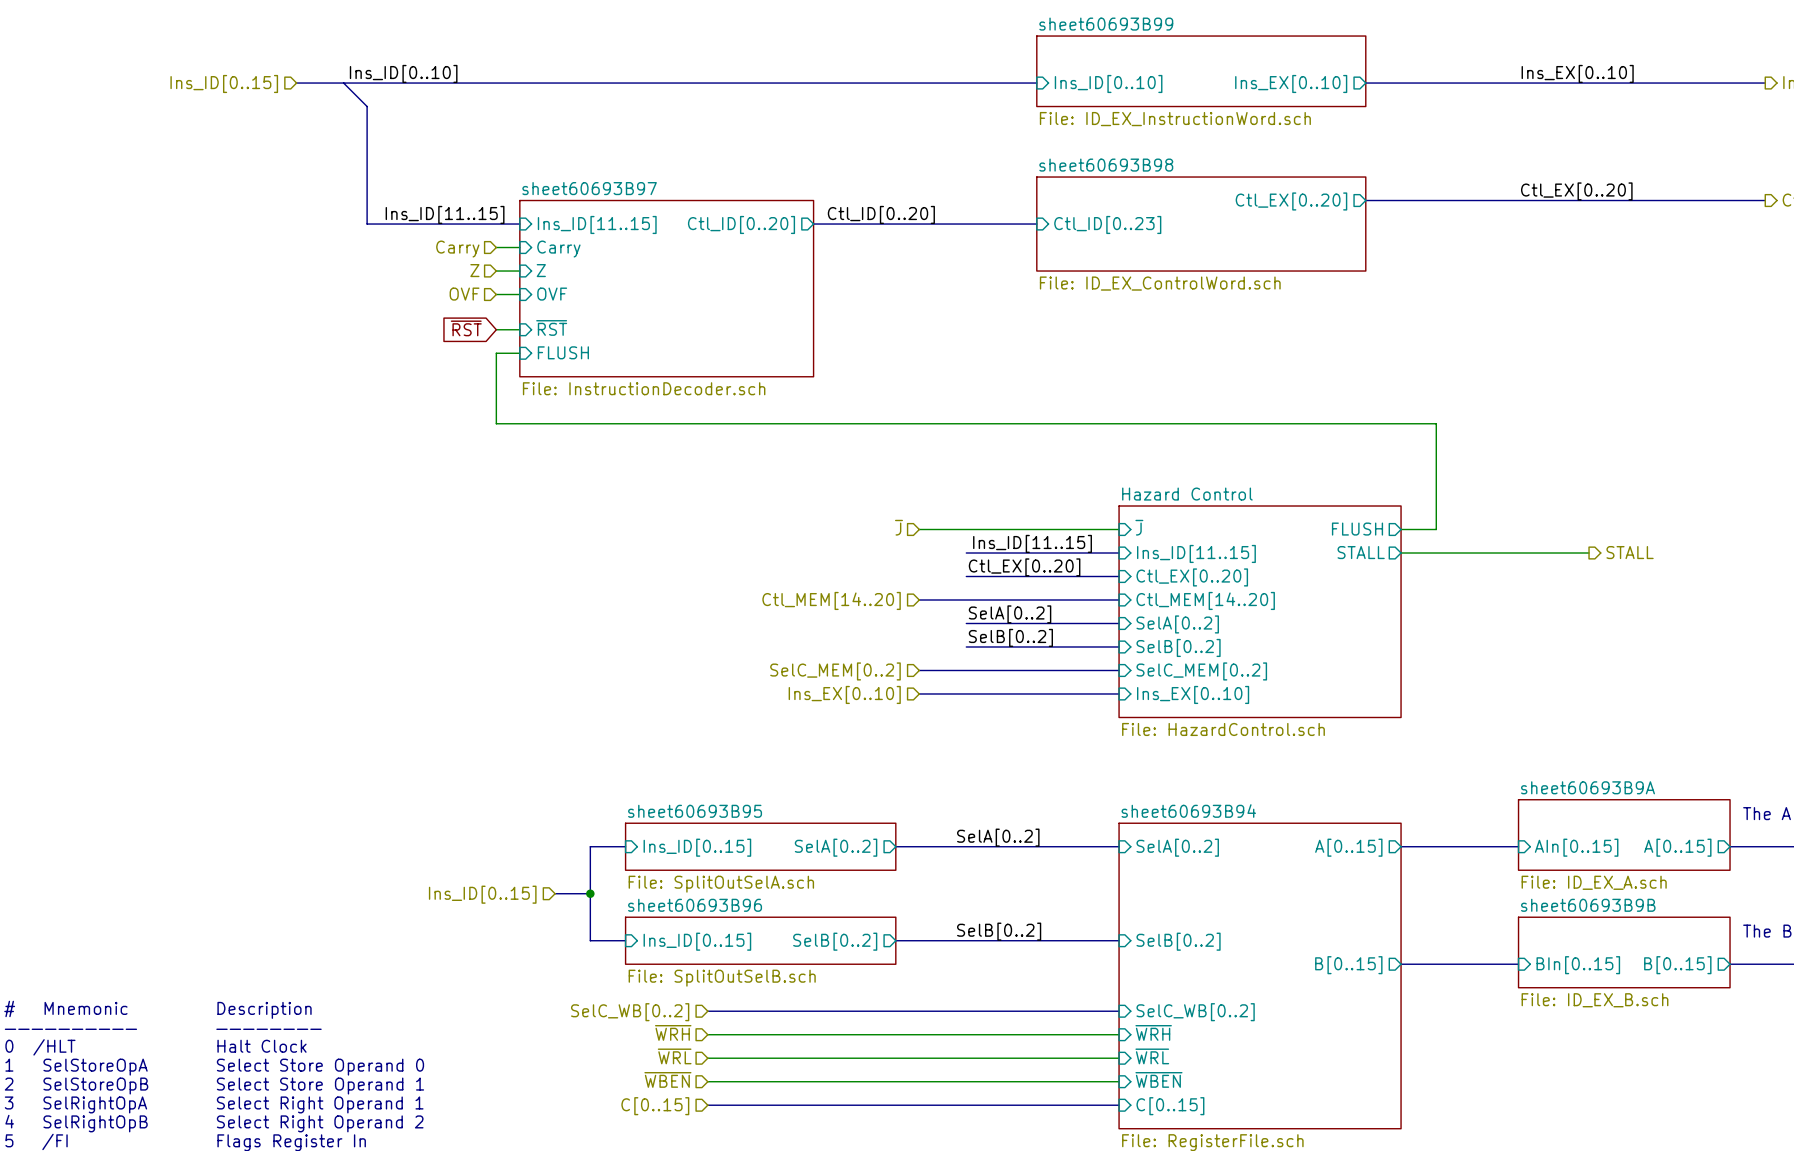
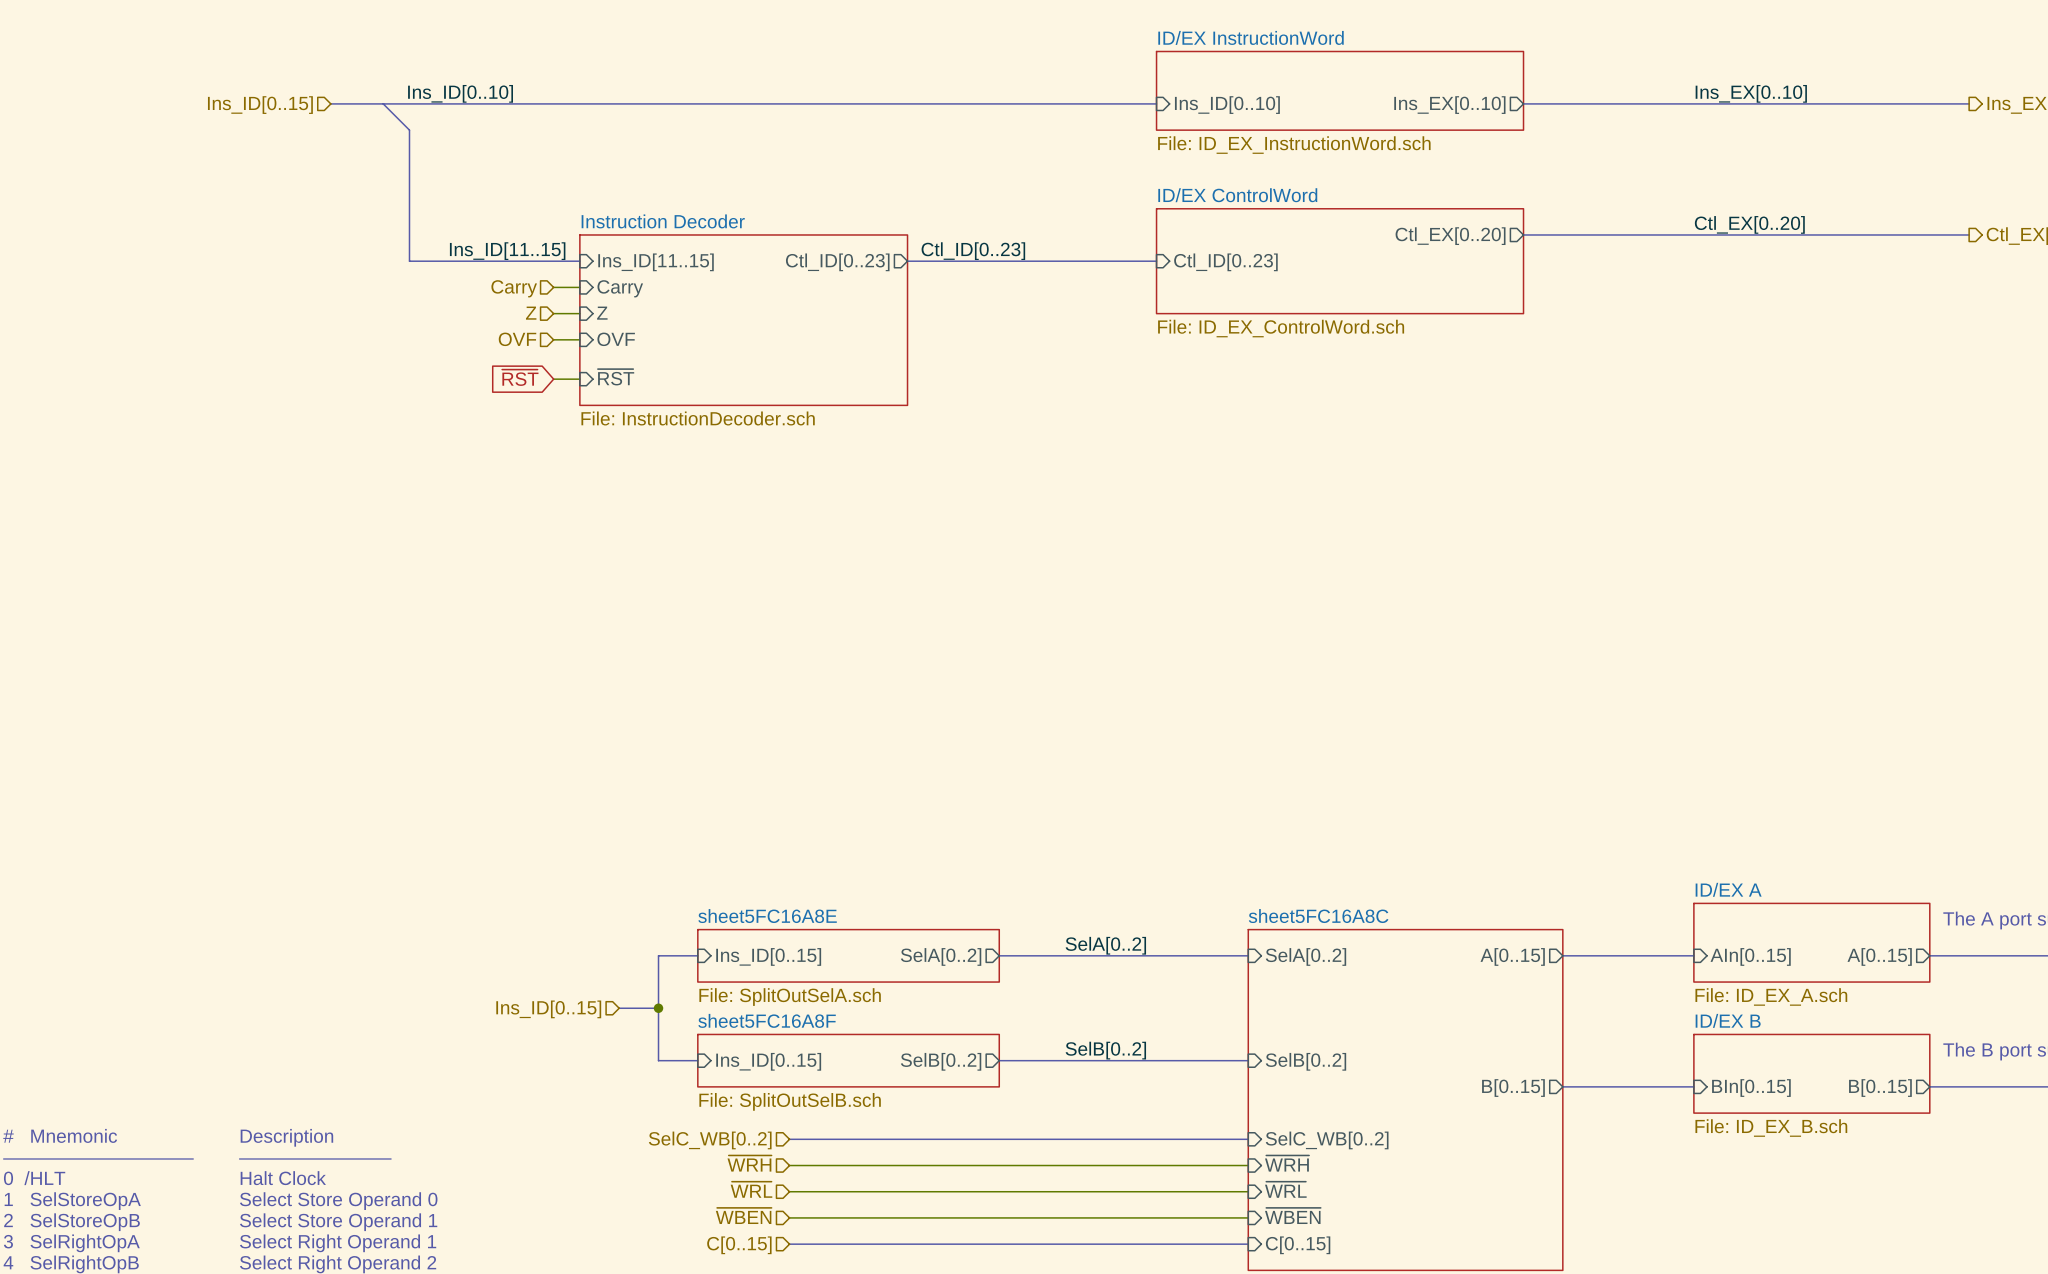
sheet sheet60693B99 name: sheet60693B99 (1106, 24) -> ID/EX InstructionWord (1251, 37)
sheet sheet60693B98 name: sheet60693B98 (1106, 165) -> ID/EX ControlWord (1237, 195)
label: Ctl_ID[0..20] (881, 214) -> Ctl_ID[0..23] (973, 251)
sheet pin: Ctl_ID[0..20] (741, 224) -> Ctl_ID[0..23] (837, 262)
sheet Instruction Decoder: none -> File: InstructionDecoder.sch (743, 320)
sheet sheet60693B97: File: InstructionDecoder.sch (666, 288) -> none
sheet pin: FLUSH (563, 352) -> none
wire: (519, 353) (496, 353) (496, 423) (1436, 423) (1436, 529) (1401, 529) -> none
hierarchical label: ~{J} (898, 527) -> none
sheet pin: ~{J} (1139, 527) -> none
wire: (919, 529) (1119, 529) -> none
sheet pin: FLUSH (1357, 529) -> none
label: Ins_ID[11..15] (1032, 543) -> none
sheet pin: STALL (1361, 552) -> none
hierarchical label: STALL (1630, 552) -> none
bus: (966, 553) (1119, 553) -> none
sheet pin: Ins_ID[11..15] (1196, 553) -> none
wire: (1401, 553) (1589, 553) -> none
label: Ctl_EX[0..20] (1024, 567) -> none
bus: (966, 576) (1119, 576) -> none
sheet pin: Ctl_EX[0..20] (1192, 577) -> none
bus: (919, 599) (1119, 599) -> none
hierarchical label: Ctl_MEM[14..20] (831, 600) -> none
sheet pin: Ctl_MEM[14..20] (1205, 600) -> none
sheet Hazard Control: File: HazardControl.sch (1260, 611) -> none
label: SelA[0..2] (1010, 614) -> none
bus: (966, 623) (1119, 623) -> none
sheet pin: SelA[0..2] (1177, 624) -> none
label: SelB[0..2] (1010, 637) -> none
bus: (966, 646) (1119, 646) -> none
sheet pin: SelB[0..2] (1178, 647) -> none
bus: (919, 670) (1119, 670) -> none
hierarchical label: SelC_MEM[0..2] (835, 671) -> none
sheet pin: SelC_MEM[0..2] (1201, 671) -> none
bus: (919, 693) (1119, 693) -> none
hierarchical label: Ins_EX[0..10] (844, 694) -> none
sheet pin: Ins_EX[0..10] (1193, 694) -> none
sheet sheet60693B9A name: sheet60693B9A (1588, 787) -> ID/EX A (1728, 889)
sheet sheet60693B95 name: sheet60693B95 (695, 811) -> sheet5FC16A8E (767, 916)
sheet sheet60693B94 name: sheet60693B94 (1188, 811) -> sheet5FC16A8C (1318, 916)
sheet sheet60693B96 name: sheet60693B96 (695, 905) -> sheet5FC16A8F (767, 1020)
sheet sheet60693B9B name: sheet60693B9B (1588, 905) -> ID/EX B (1728, 1020)

